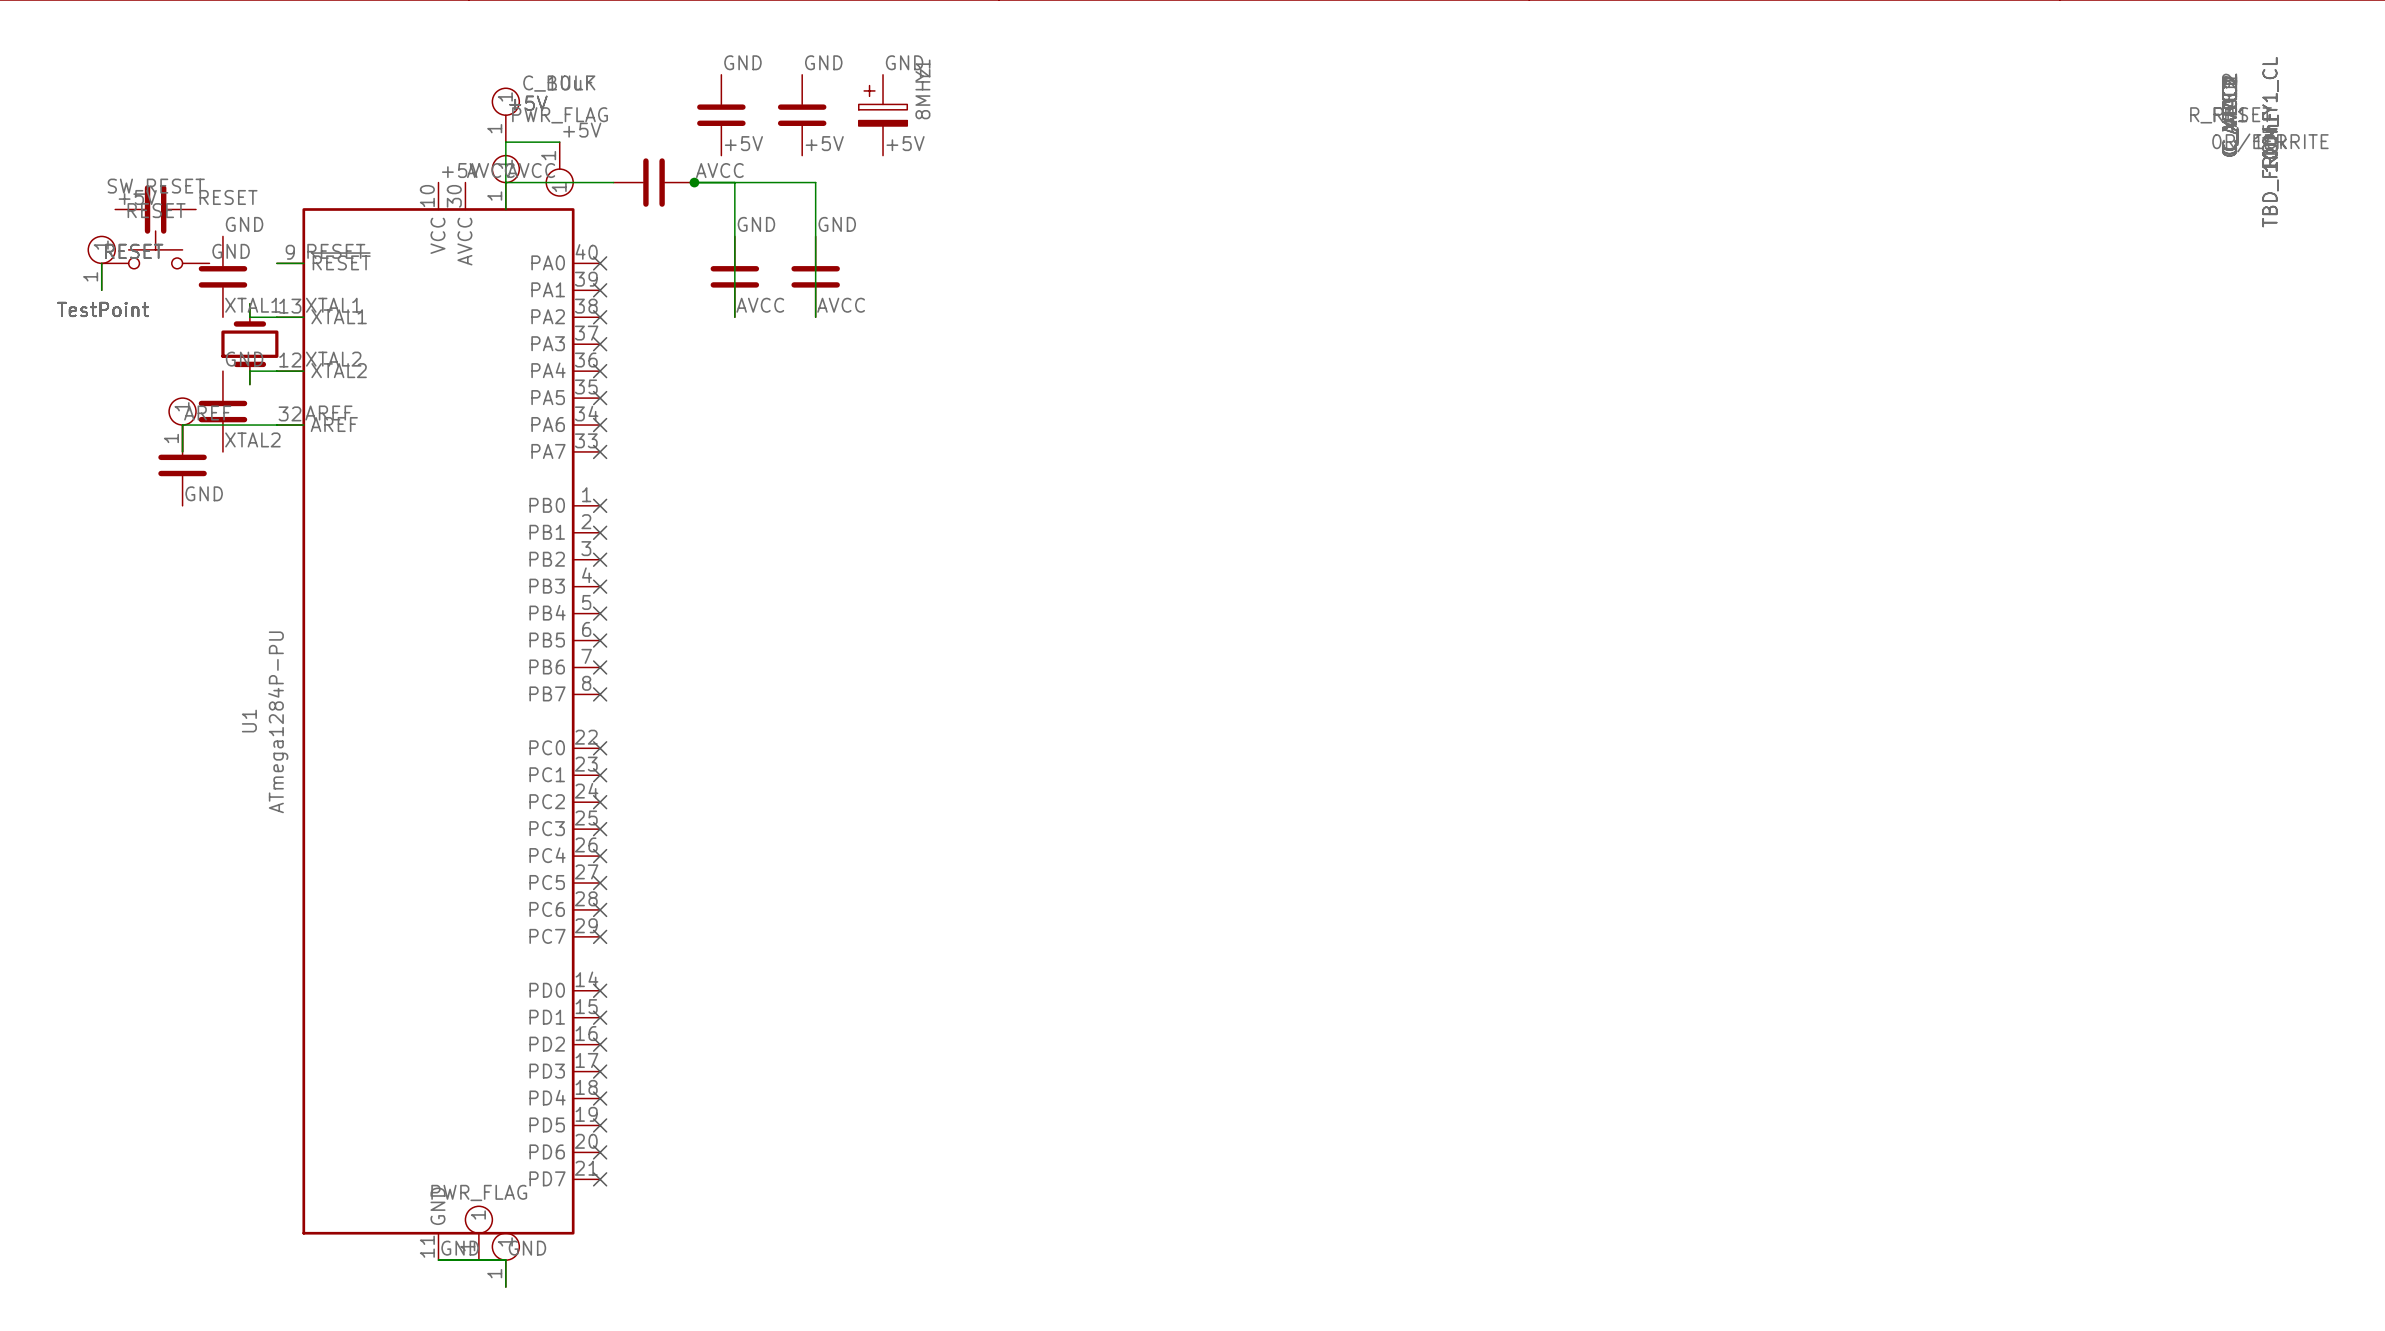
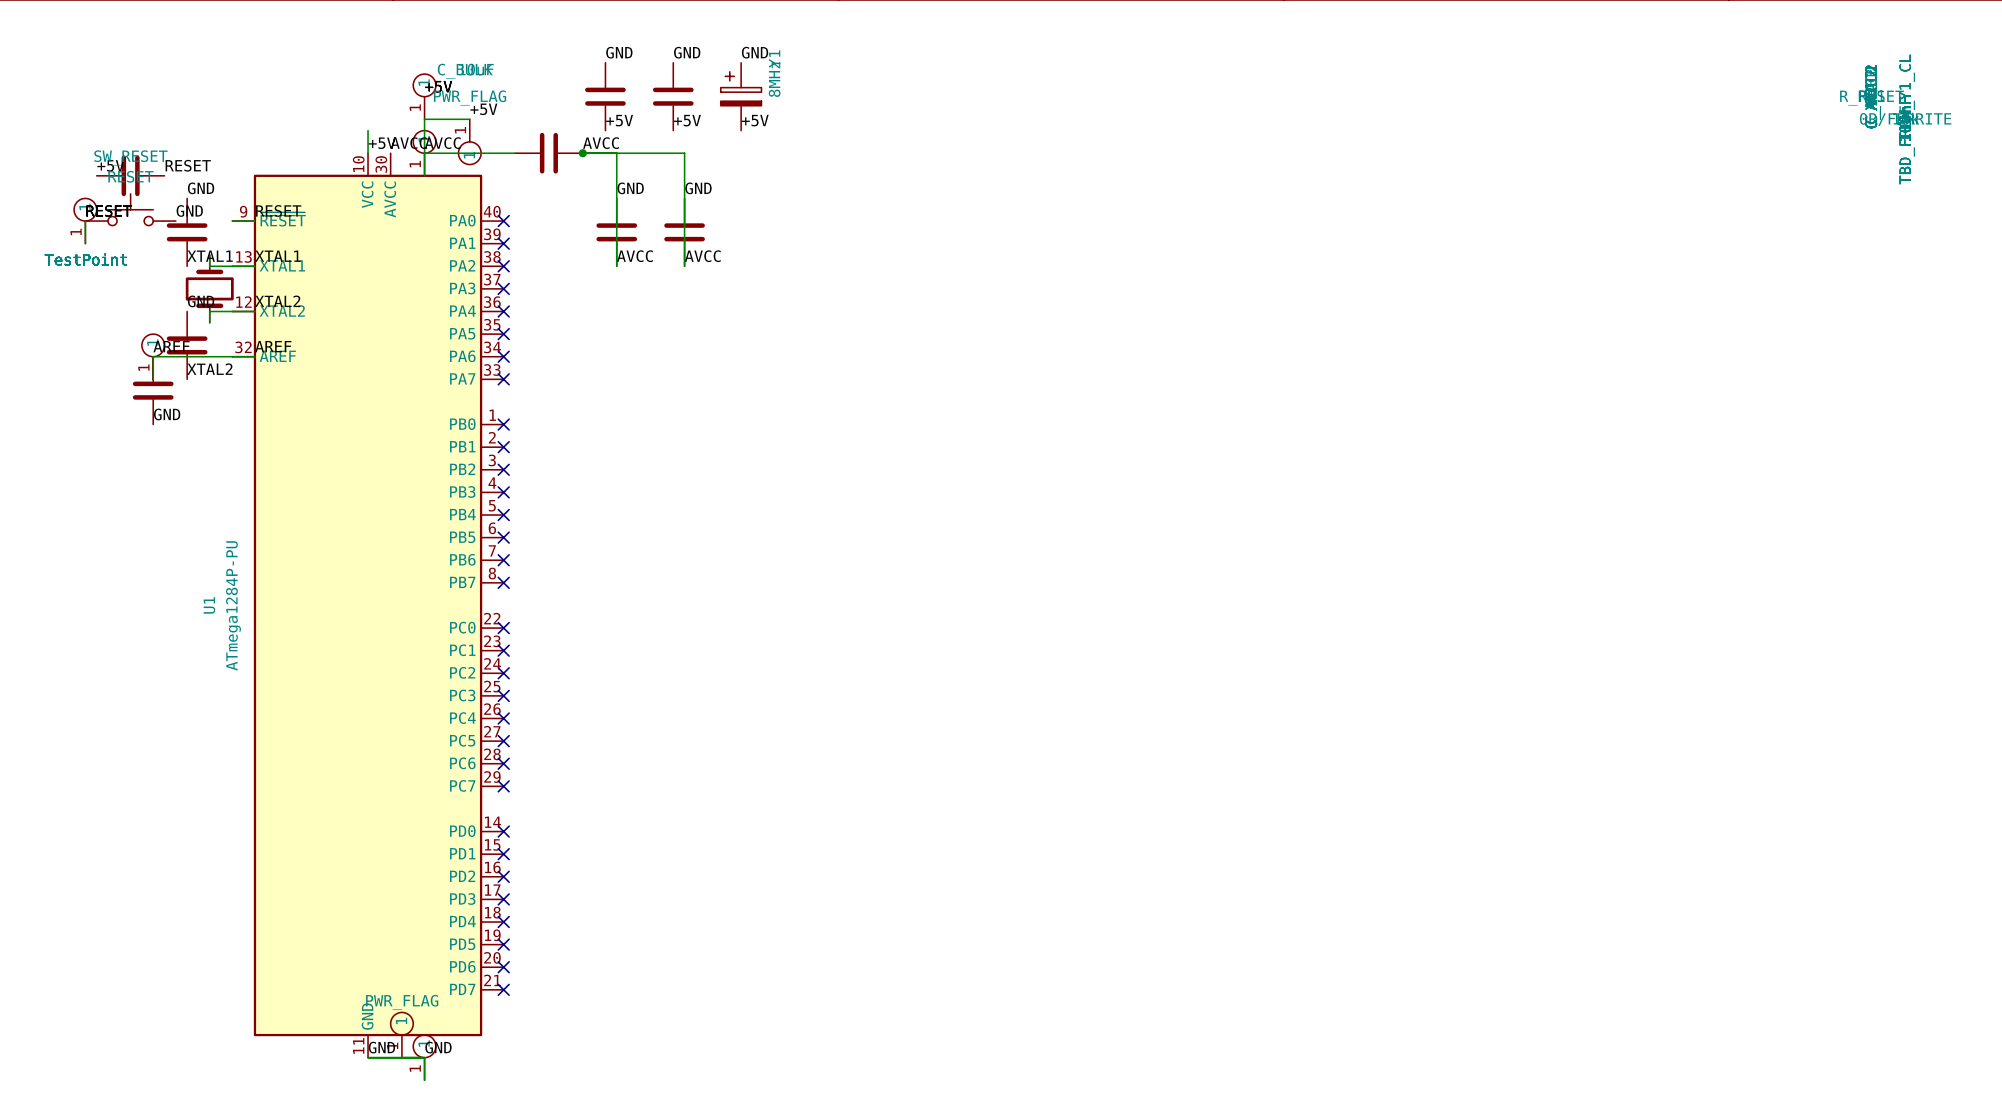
wire: none -> (368, 130) (368, 153)

